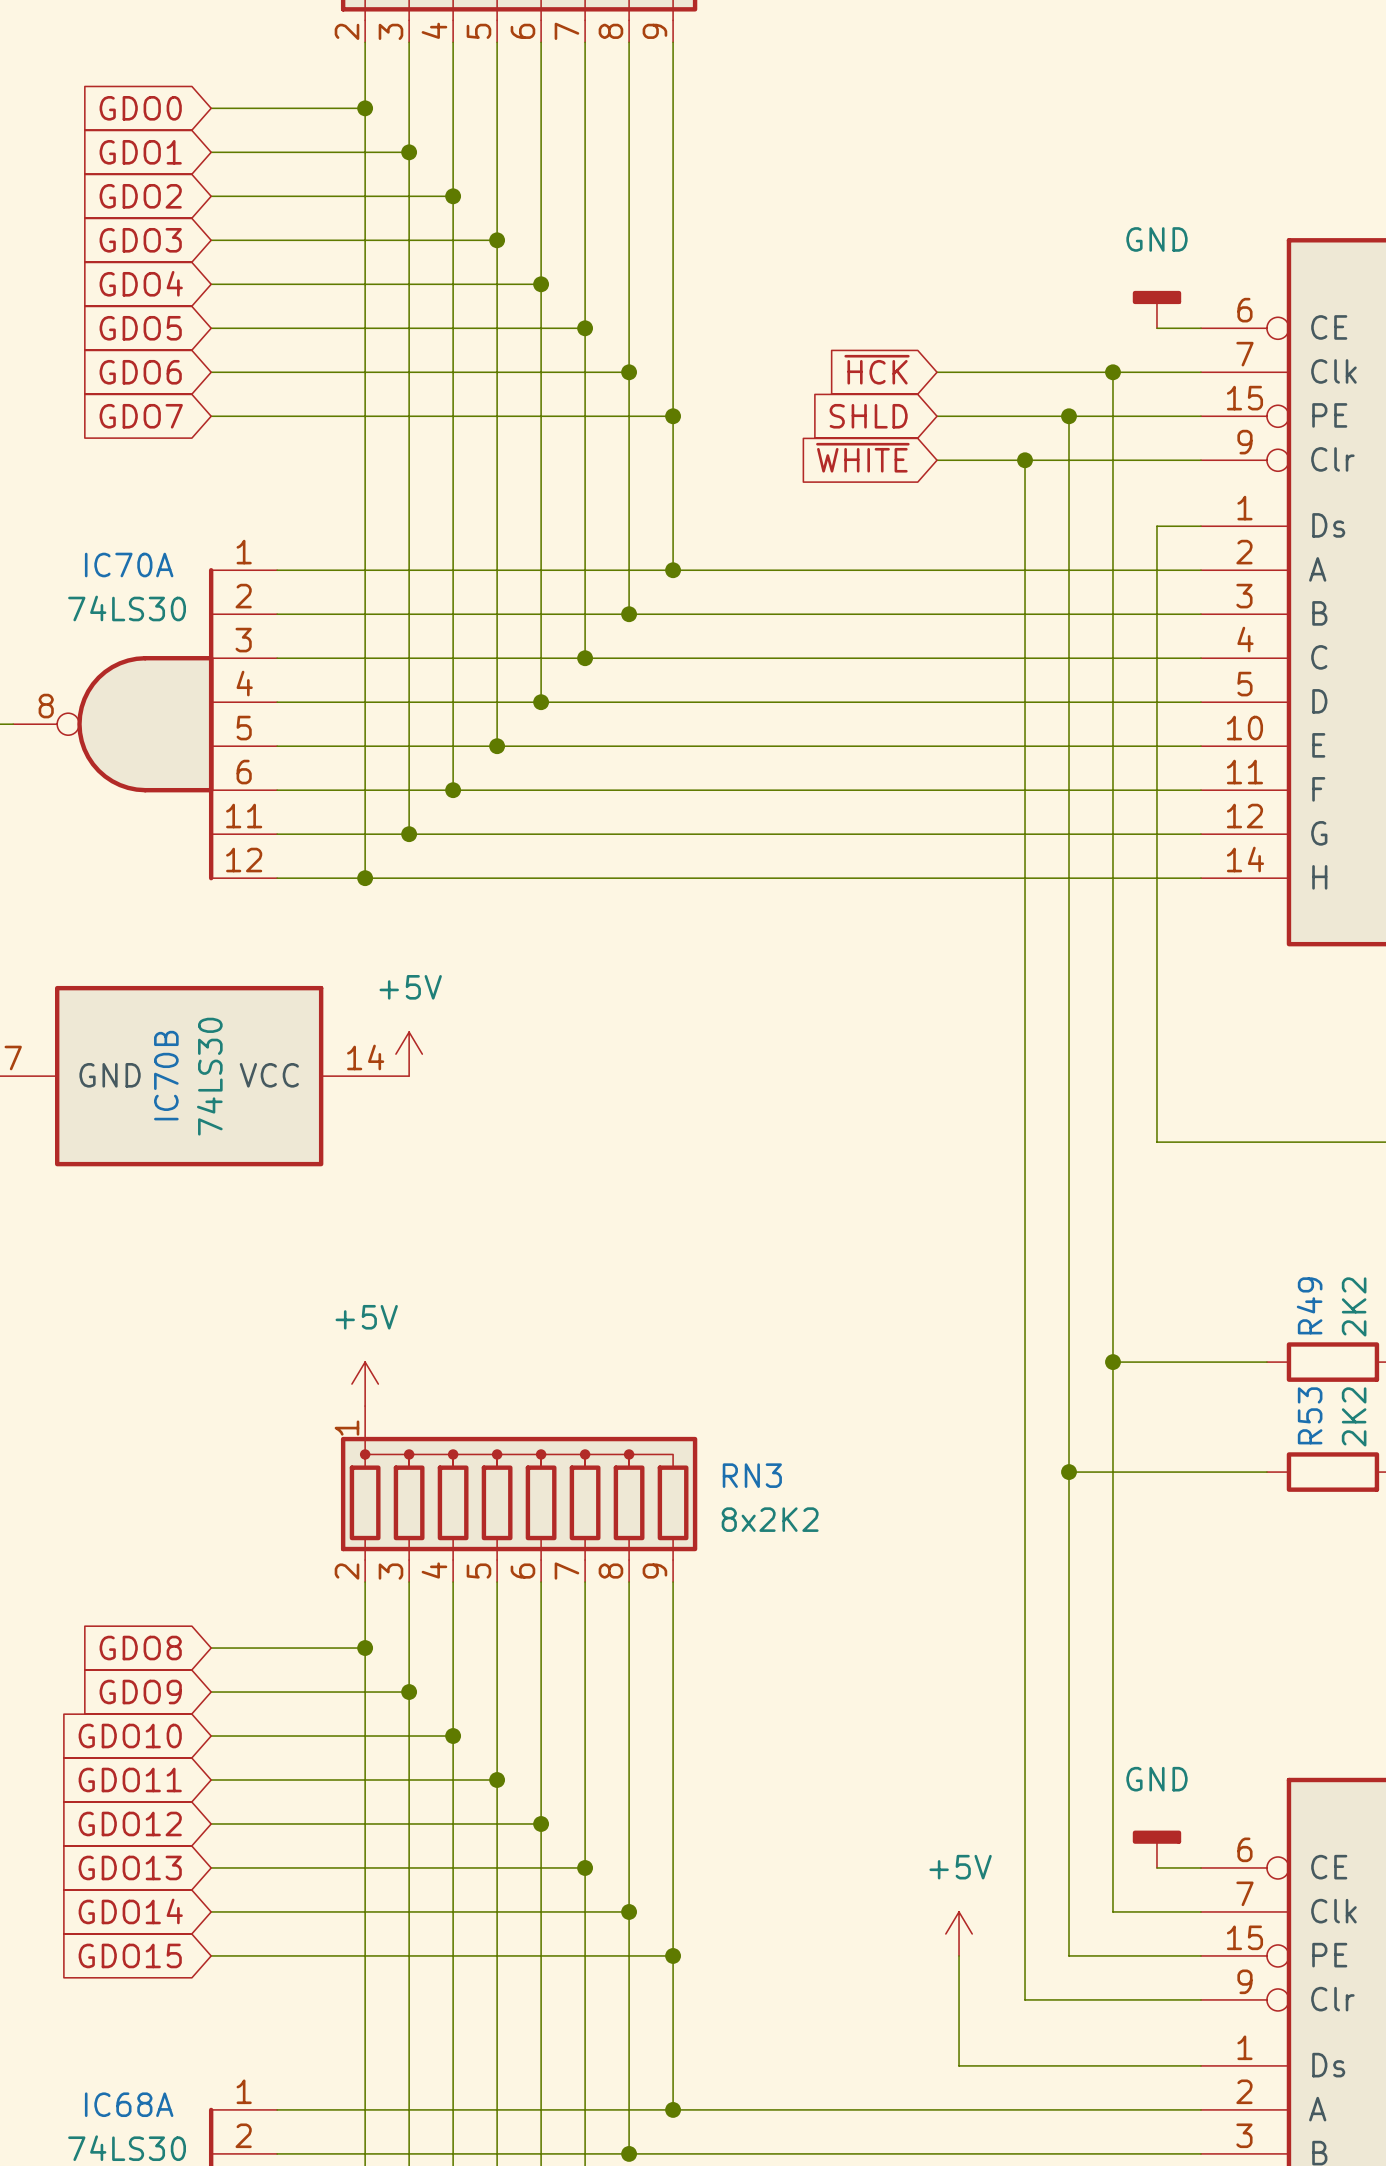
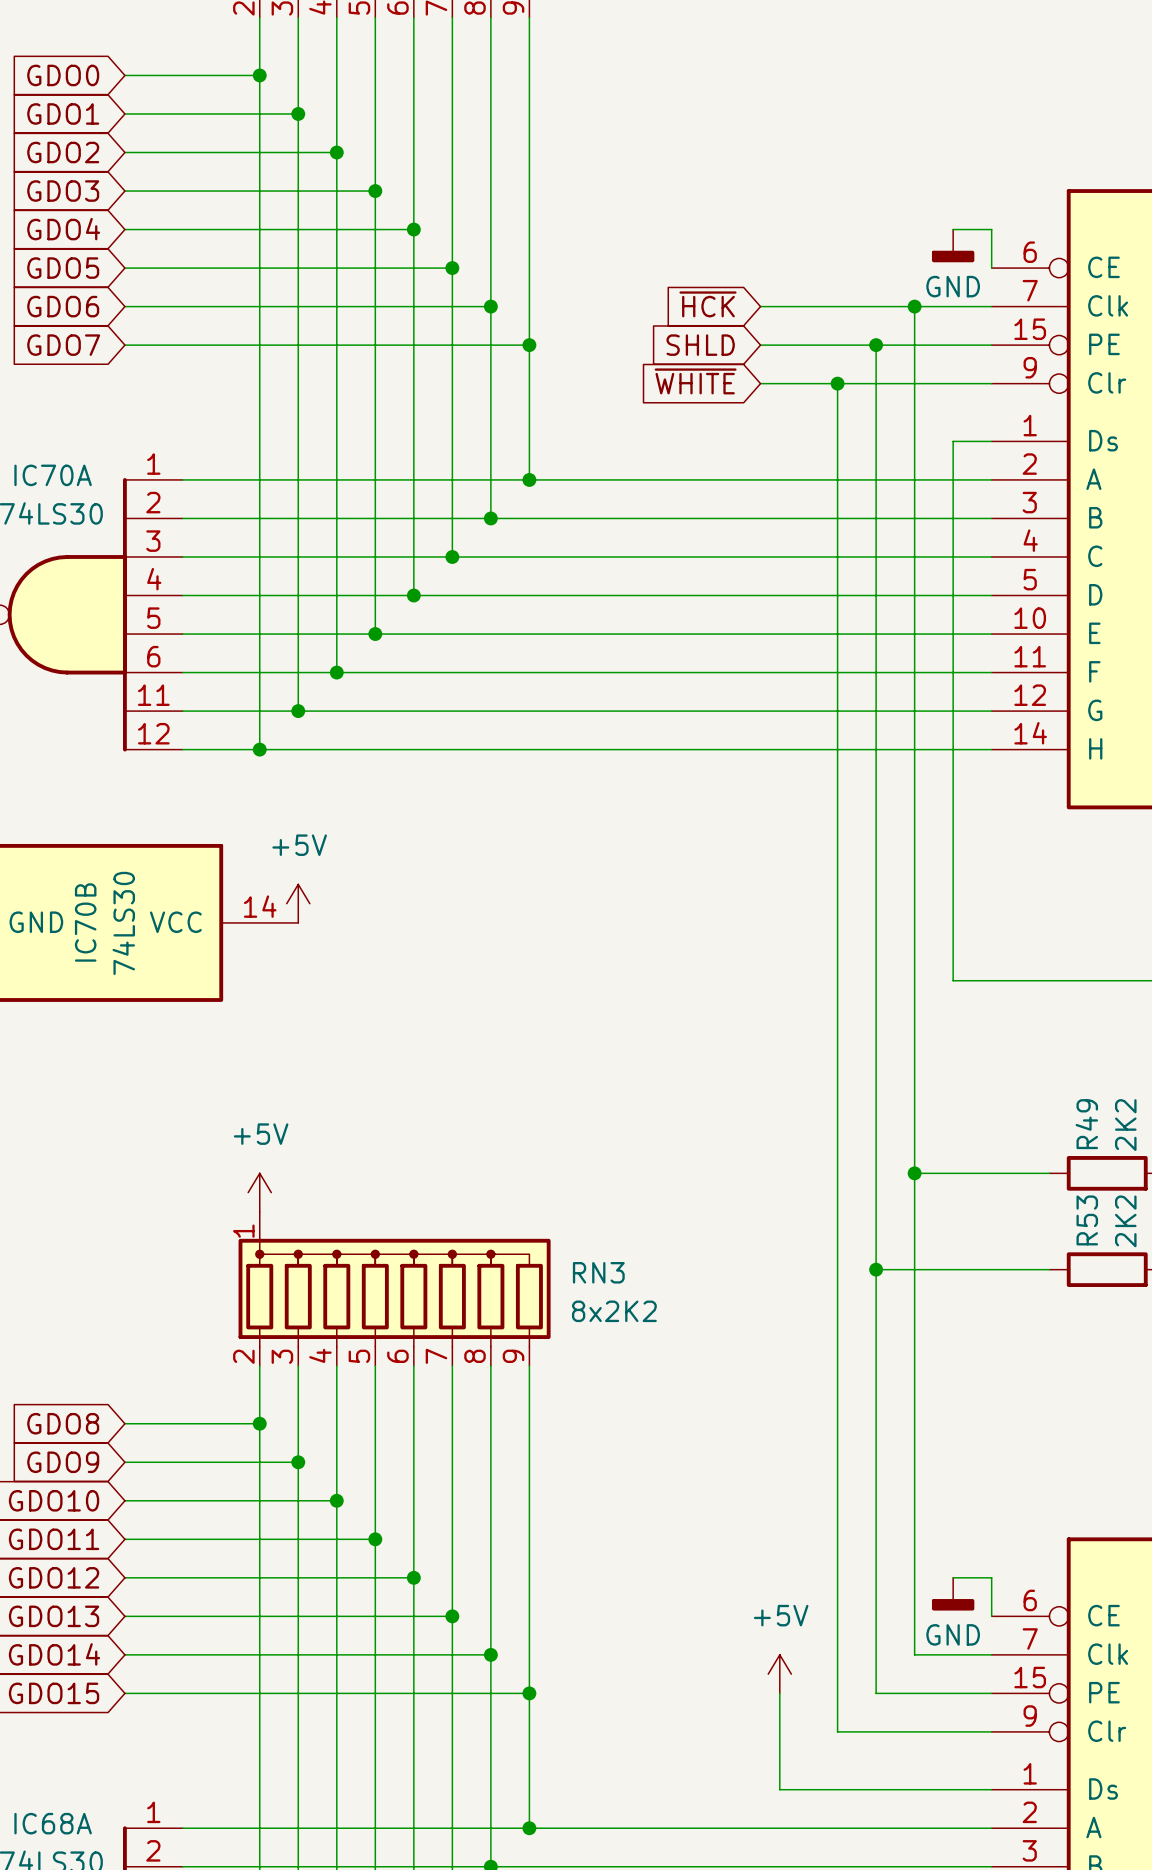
power symbol rotation: 0° (1156, 309) -> 180° (953, 245)
wire: (1156, 328) (1200, 328) -> (953, 229) (991, 229) (991, 268)
power symbol rotation: 0° (1156, 1849) -> 180° (953, 1594)
wire: (1156, 1867) (1200, 1867) -> (953, 1577) (991, 1577) (991, 1616)

